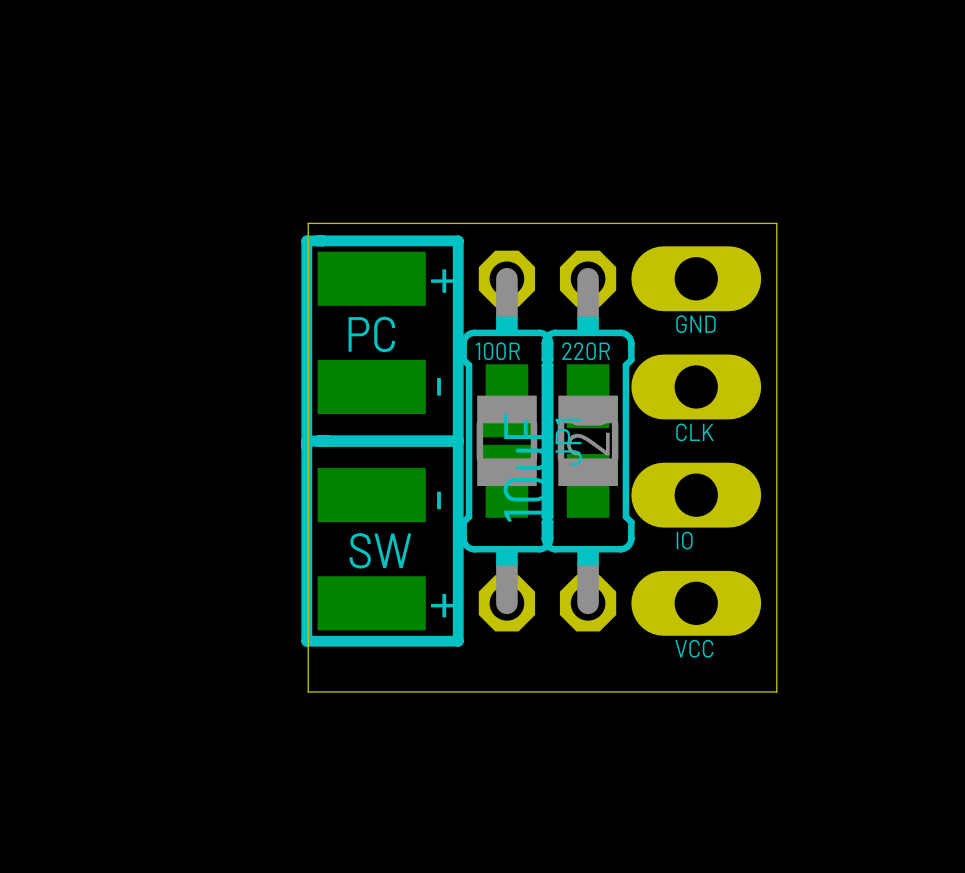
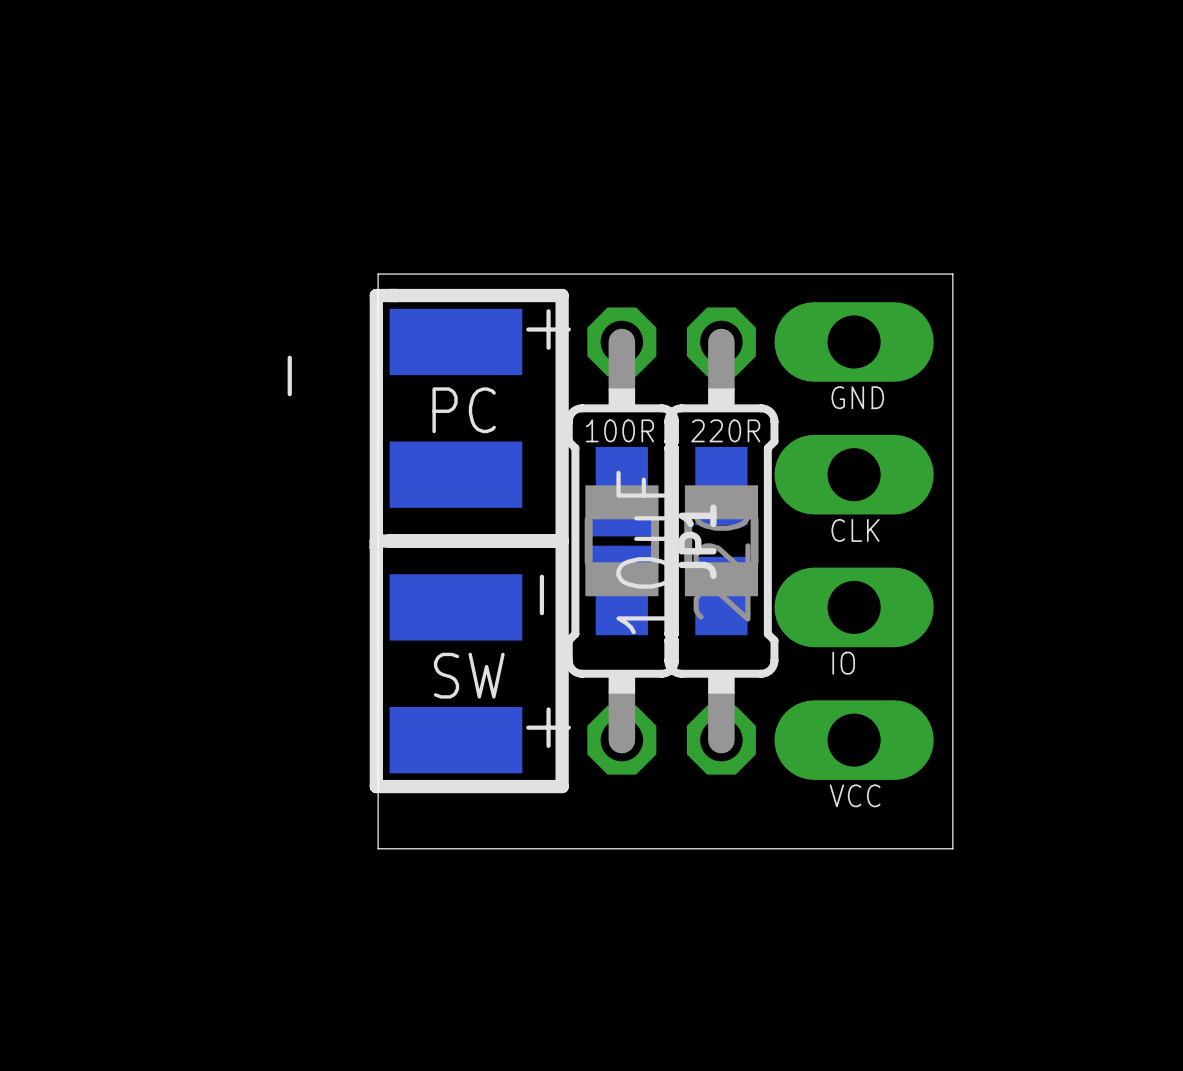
text position: - (439, 386) -> - (289, 375)

